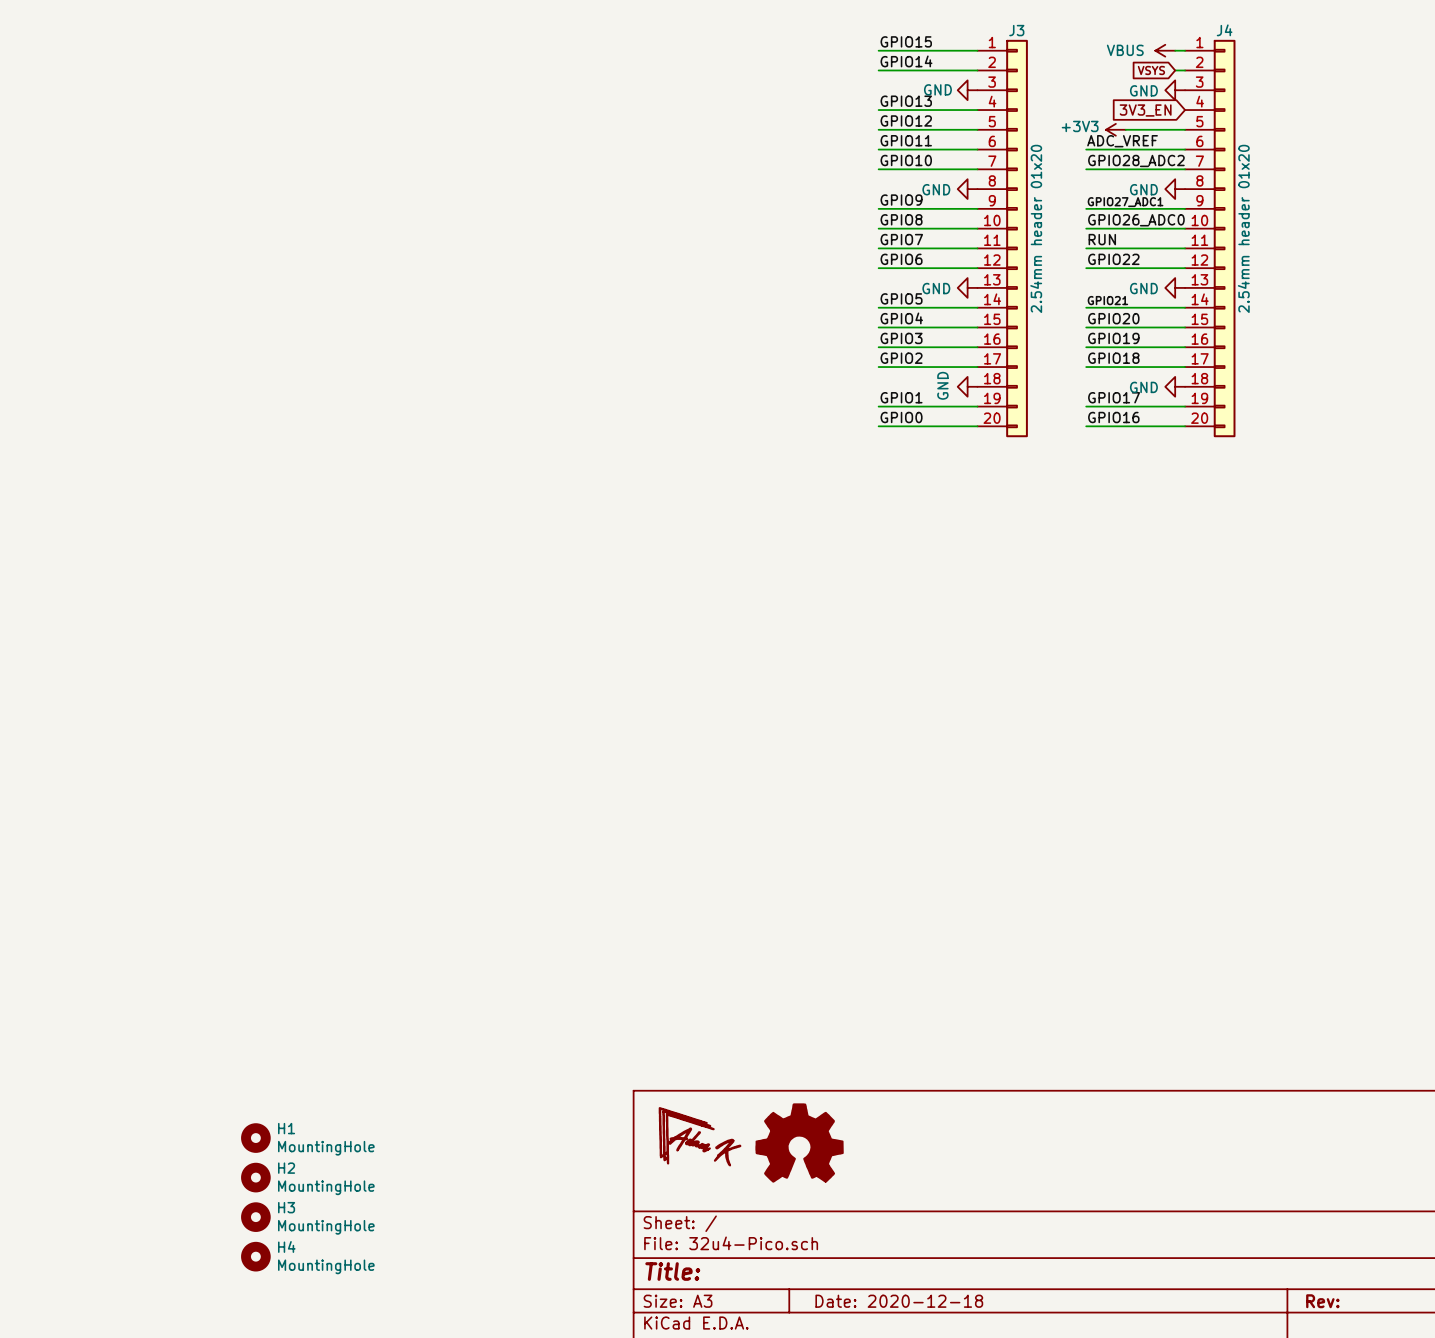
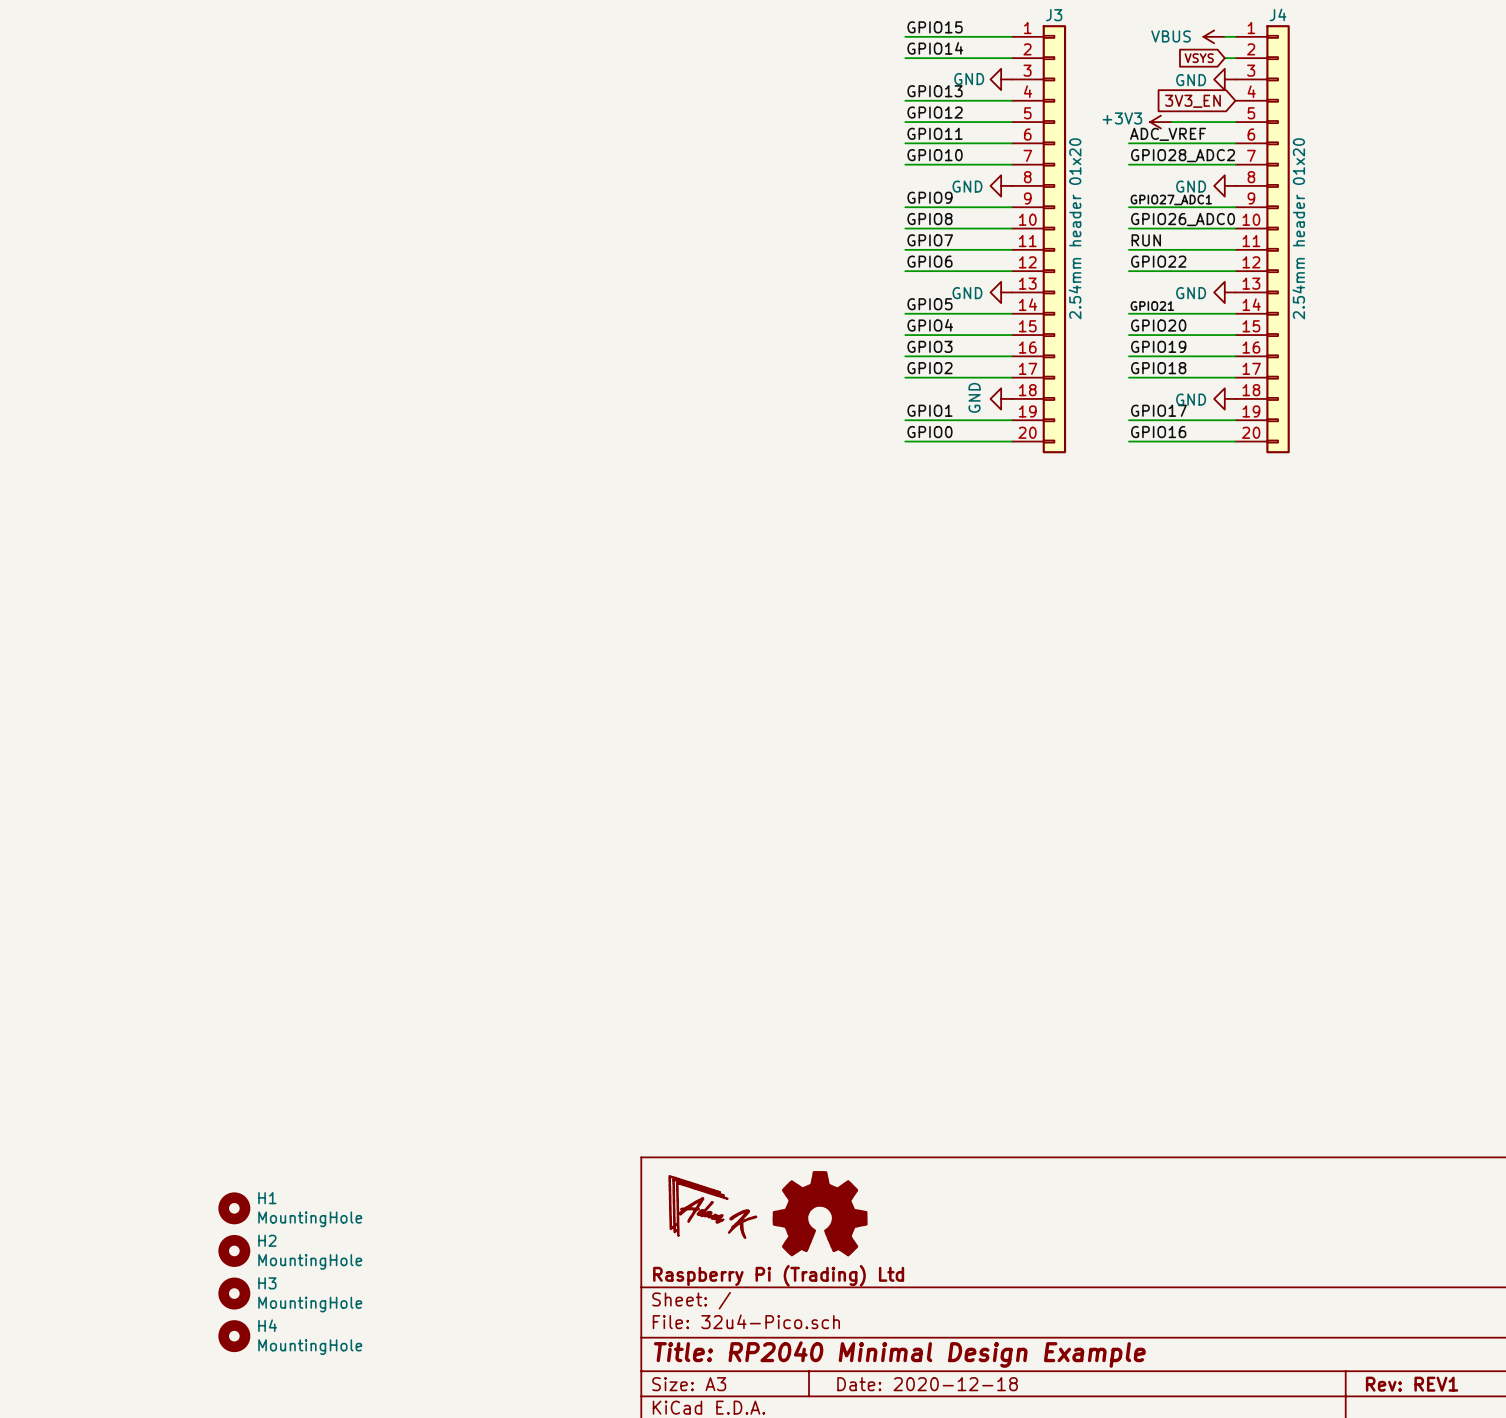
title block: none -> Raspberry Pi (Trading) Ltd (778, 1275)
title block: Title: (672, 1271) -> Title: RP2040 Minimal Design Example (899, 1354)
title block: Rev: (1322, 1301) -> Rev: REV1 (1412, 1384)

